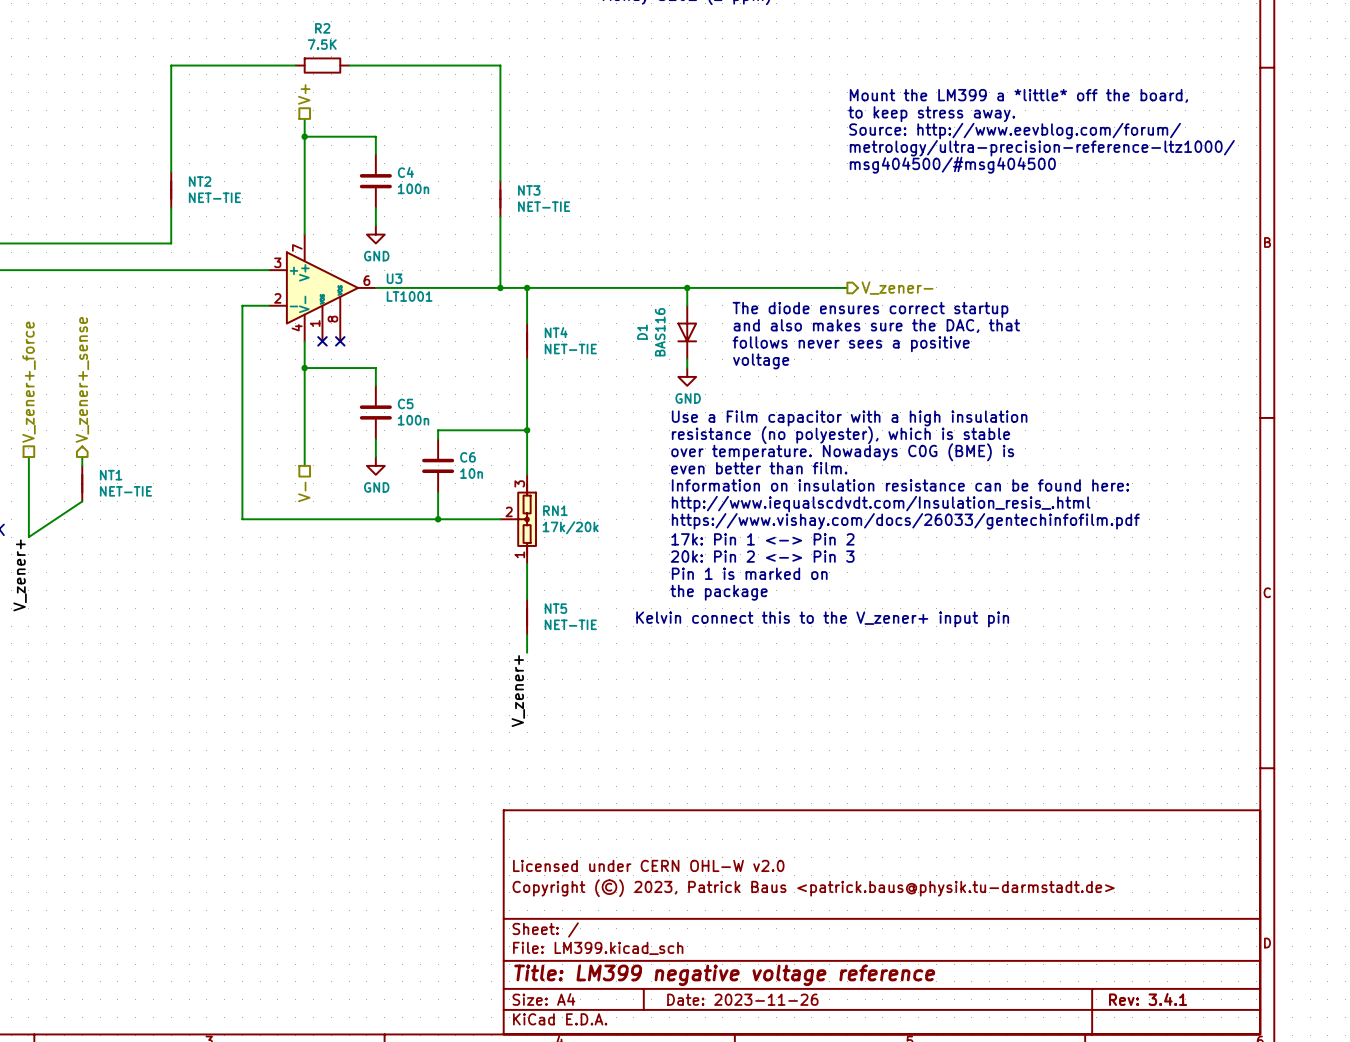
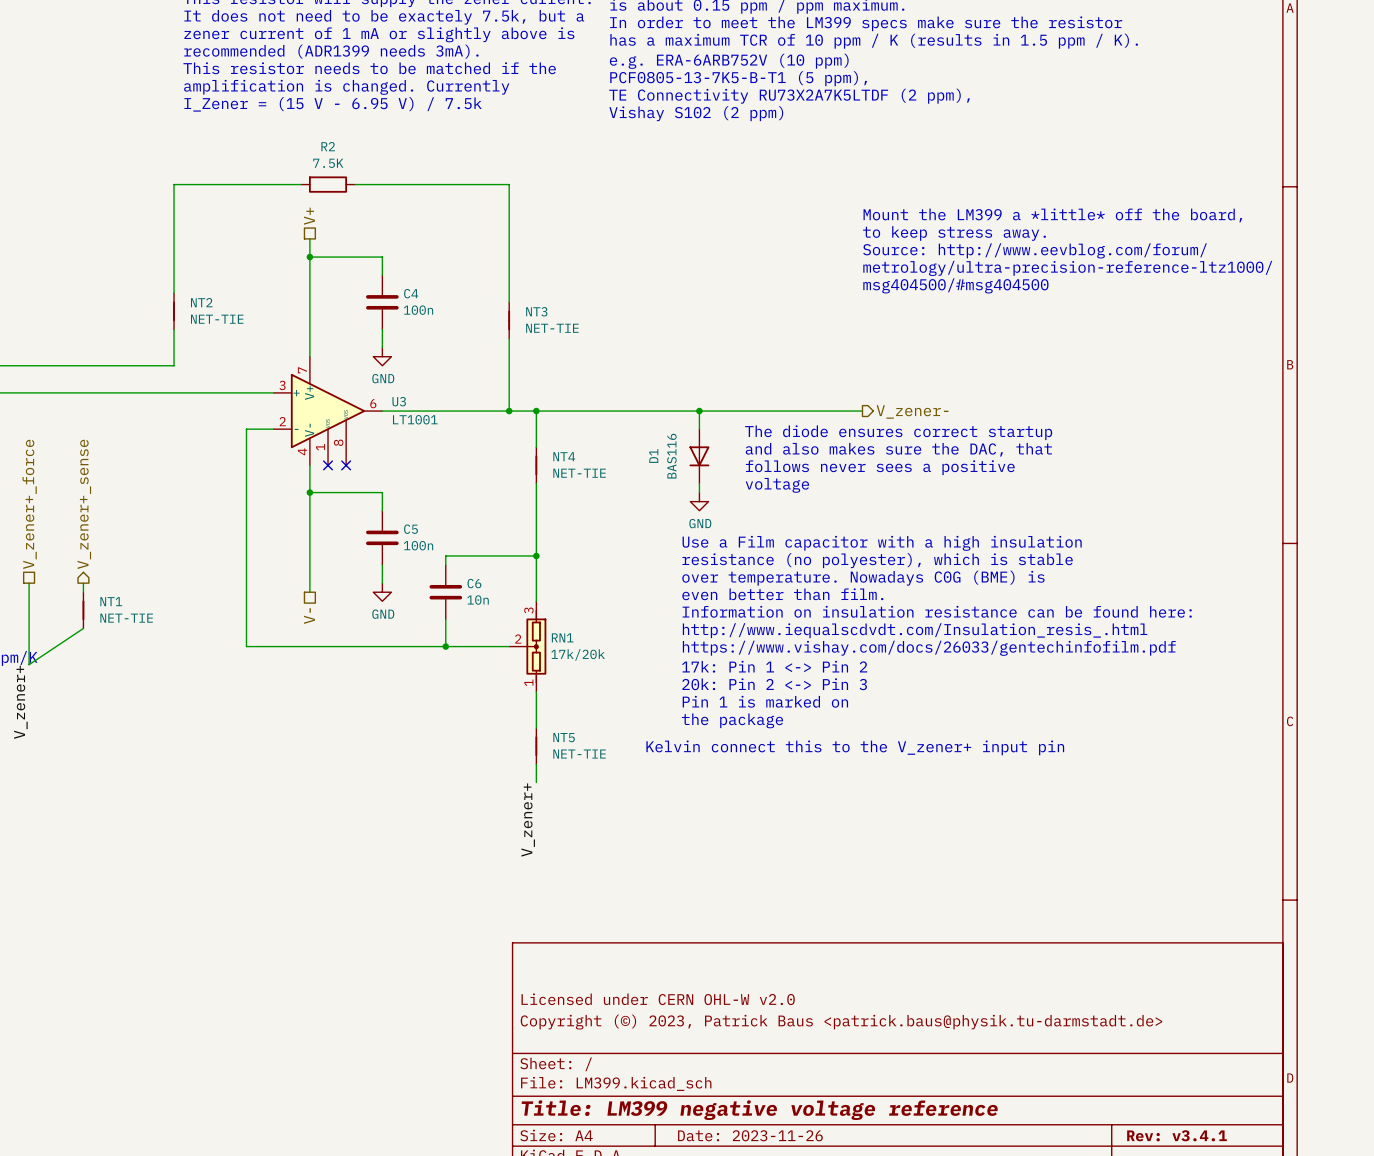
title block: Rev: 3.4.1 (1148, 999) -> Rev: v3.4.1 (1176, 1135)

